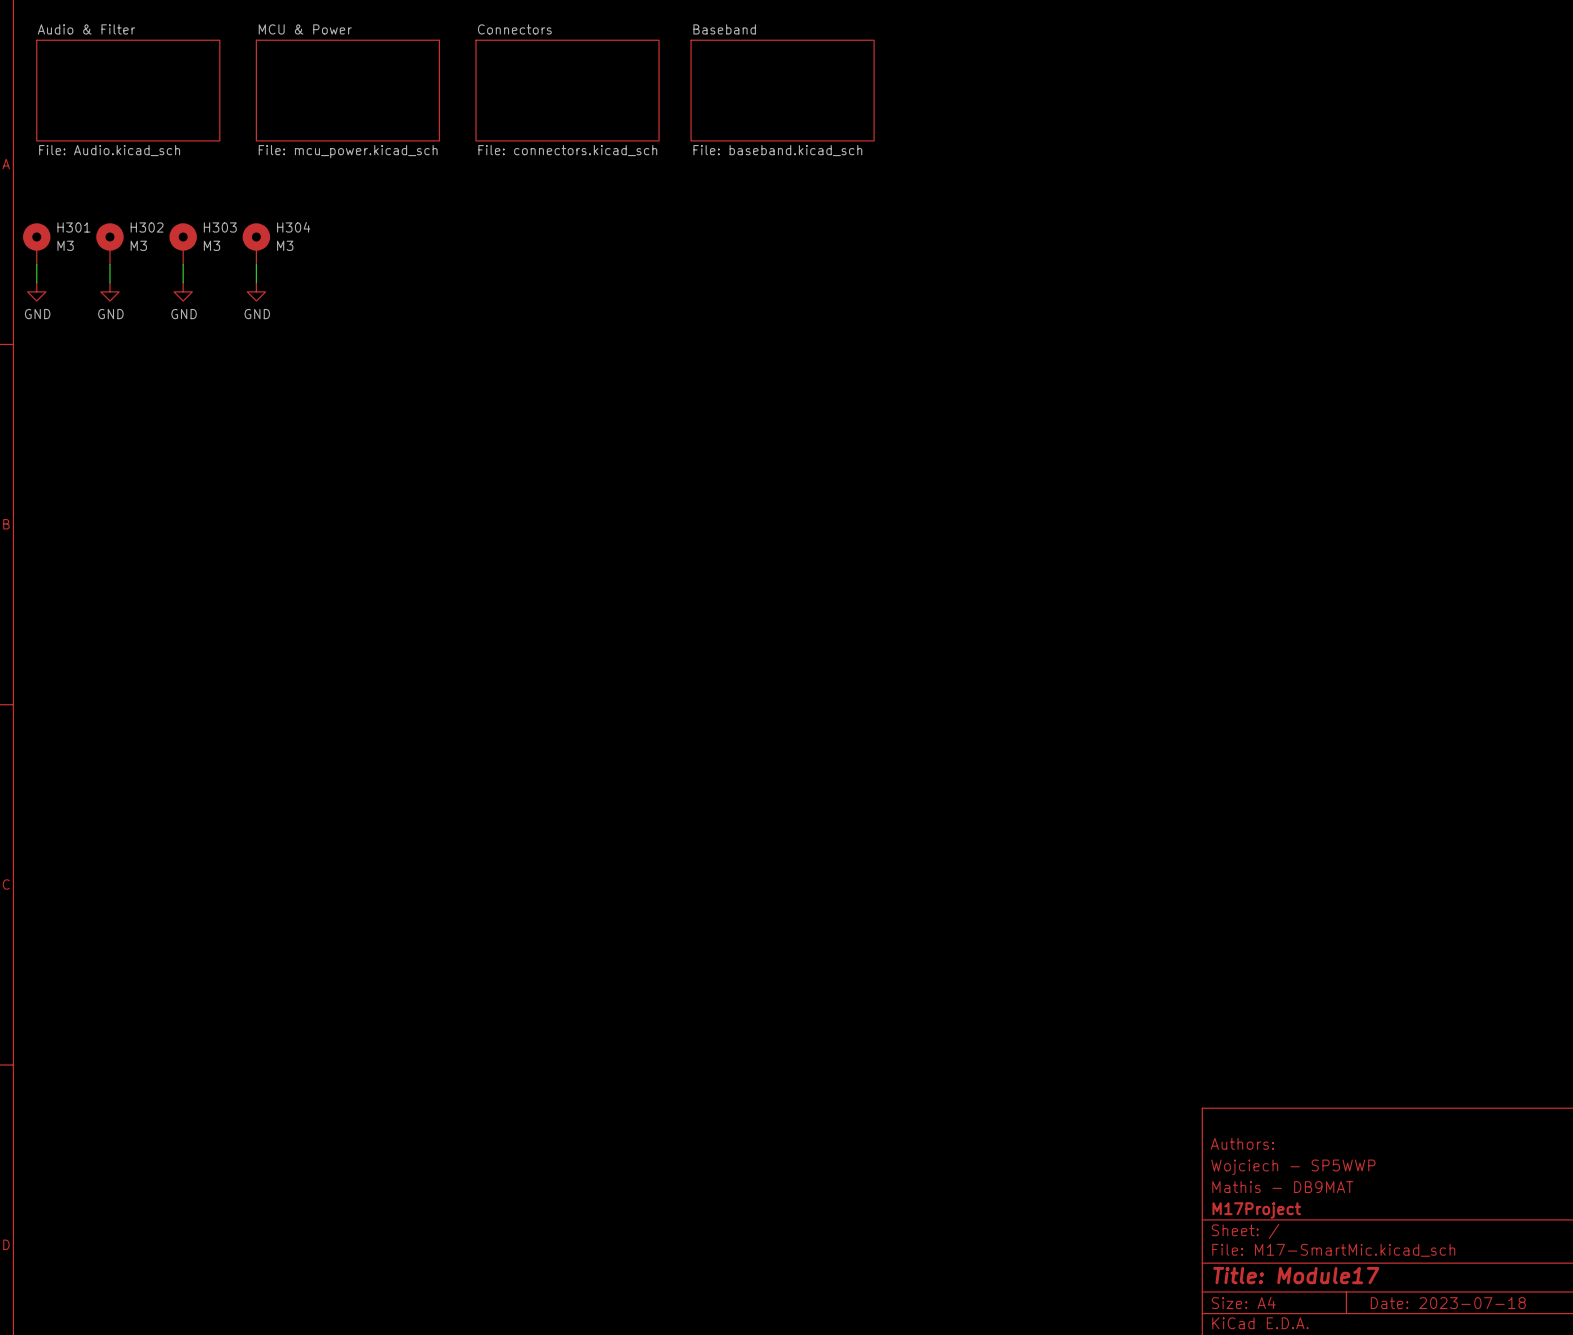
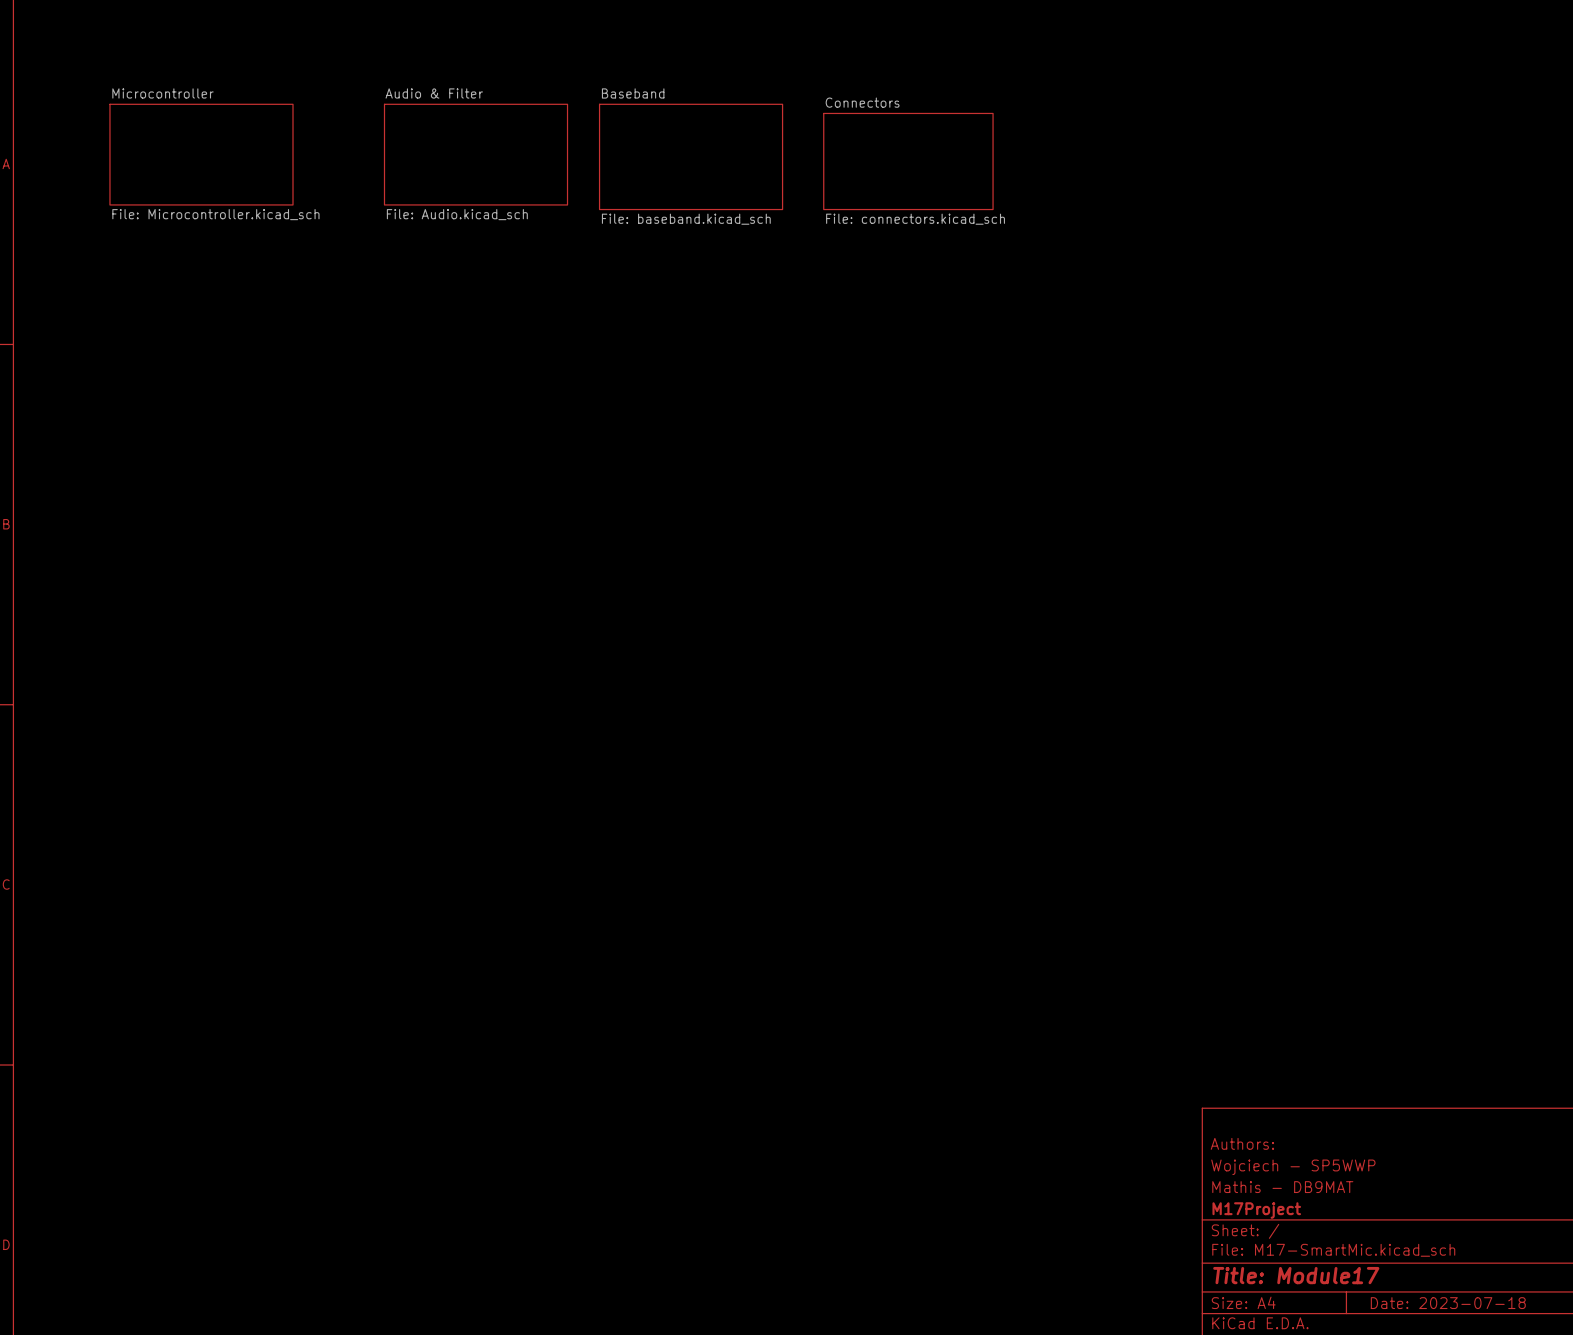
sheet Audio & Filter: File: Audio.kicad_sch (128, 90) -> none
sheet MCU & Power: File: mcu_power.kicad_sch (347, 90) -> none
sheet Connectors: File: connectors.kicad_sch (567, 90) -> none
sheet Baseband: File: baseband.kicad_sch (782, 90) -> none
sheet Microcontroller: none -> File: Microcontroller.kicad_sch (201, 154)
sheet Audio & Filter: none -> File: Audio.kicad_sch (476, 154)
sheet Baseband: none -> File: baseband.kicad_sch (691, 156)
sheet Connectors: none -> File: connectors.kicad_sch (908, 161)
H301: M3 (36, 243) -> none
H302: M3 (109, 243) -> none
H303: M3 (183, 243) -> none
H304: M3 (256, 243) -> none
wire: (36, 264) (36, 282) -> none
wire: (109, 264) (109, 282) -> none
wire: (183, 264) (183, 282) -> none
wire: (256, 264) (256, 282) -> none
power symbol: GND (36, 291) -> none
power symbol: GND (109, 291) -> none
power symbol: GND (183, 291) -> none
power symbol: GND (256, 291) -> none

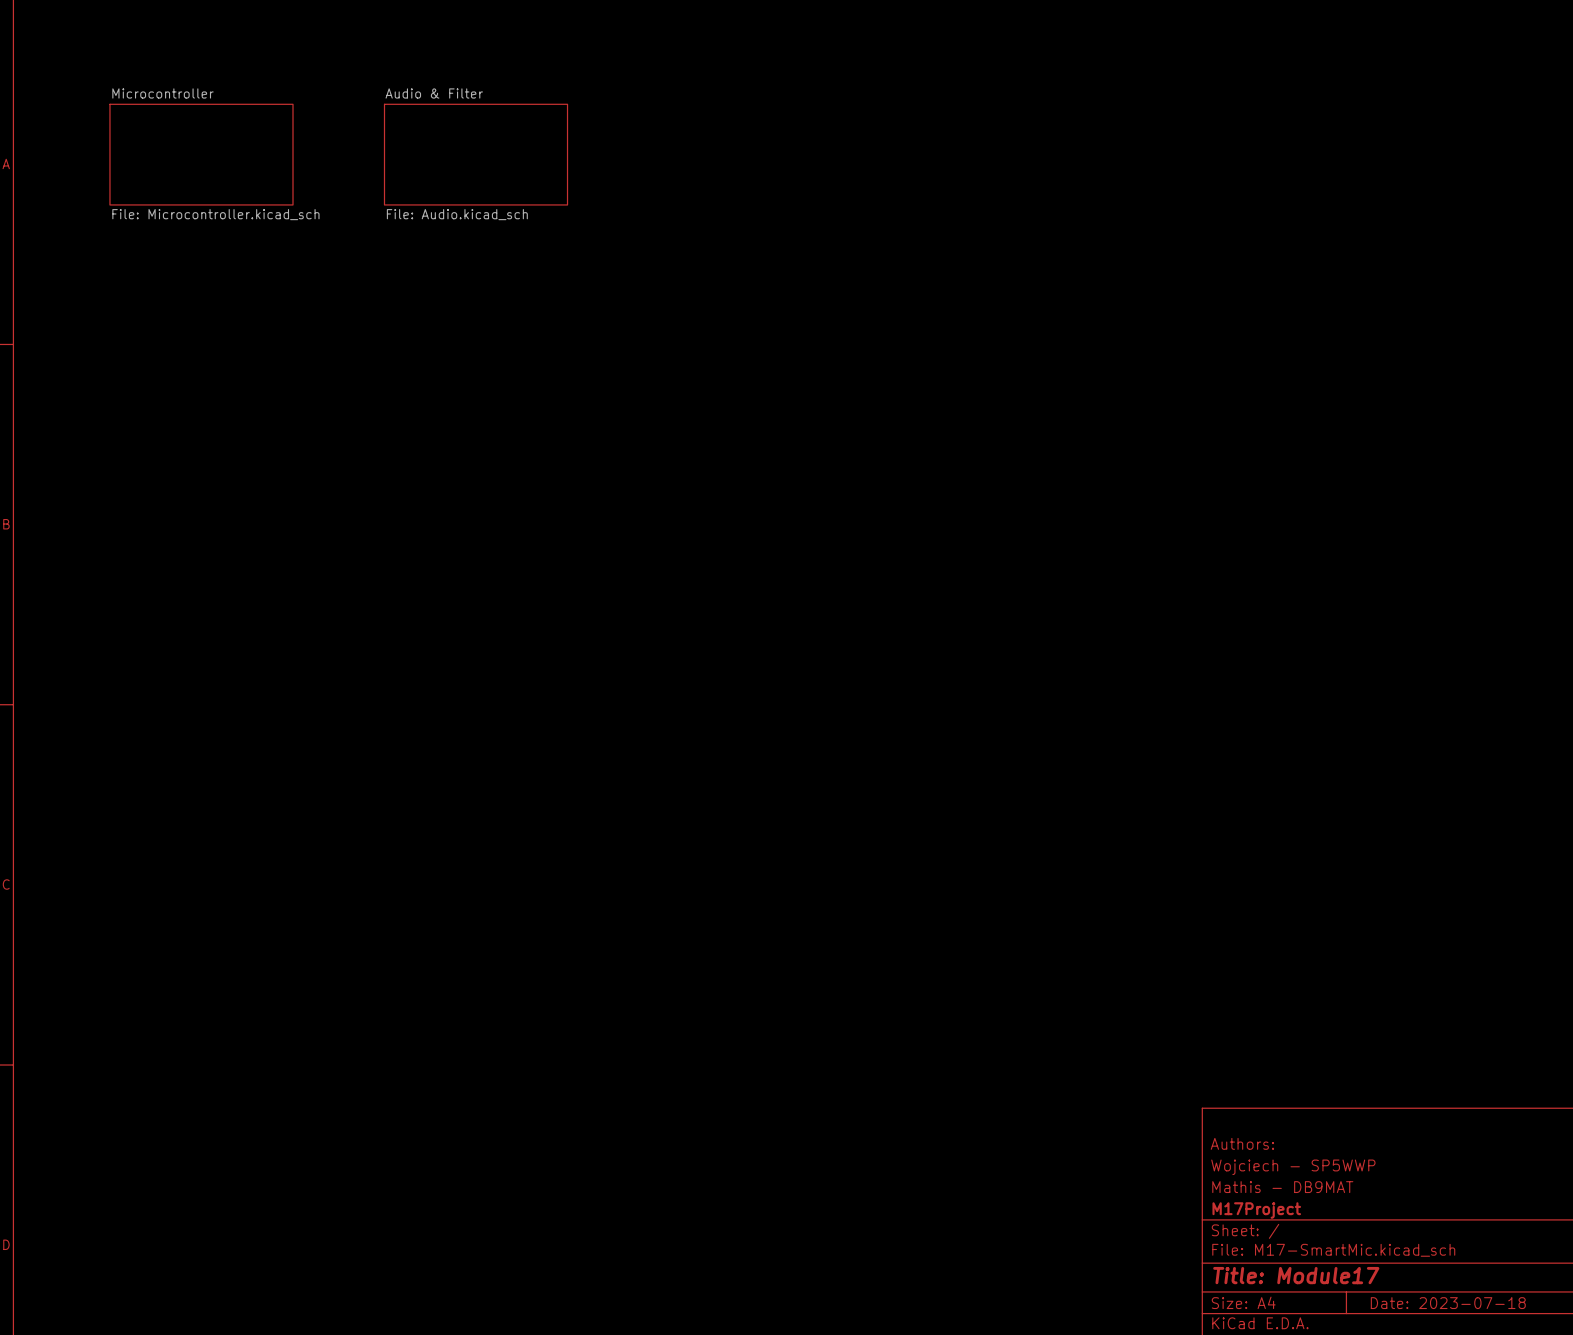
sheet Baseband: File: baseband.kicad_sch (691, 156) -> none
sheet Connectors: File: connectors.kicad_sch (908, 161) -> none

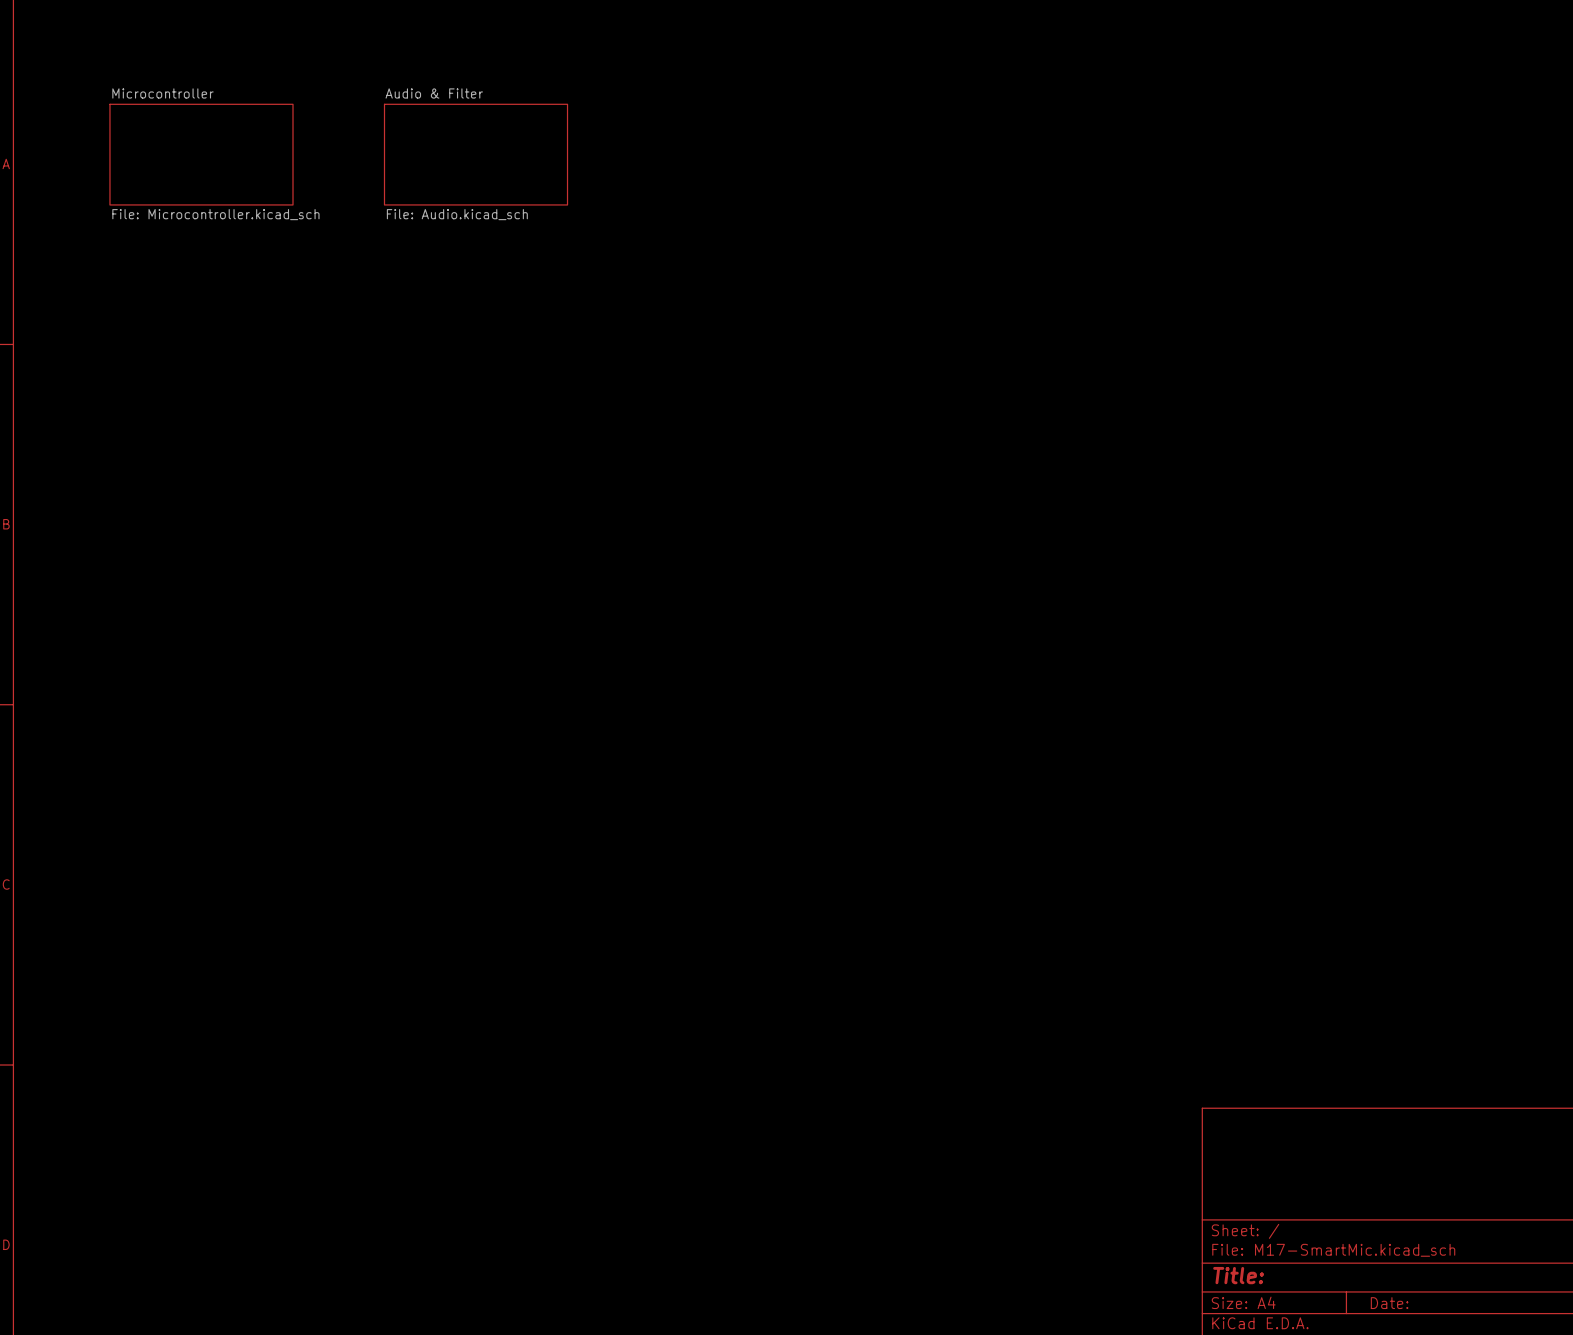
title block: Authors: (1242, 1143) -> none
title block: Wojciech - SP5WWP (1293, 1167) -> none
title block: Mathis - DB9MAT (1282, 1187) -> none
title block: M17Project (1256, 1210) -> none
title block: Title: Module17 (1296, 1275) -> Title: (1238, 1275)
title block: Date: 2023-07-18 (1448, 1303) -> Date: (1389, 1303)

